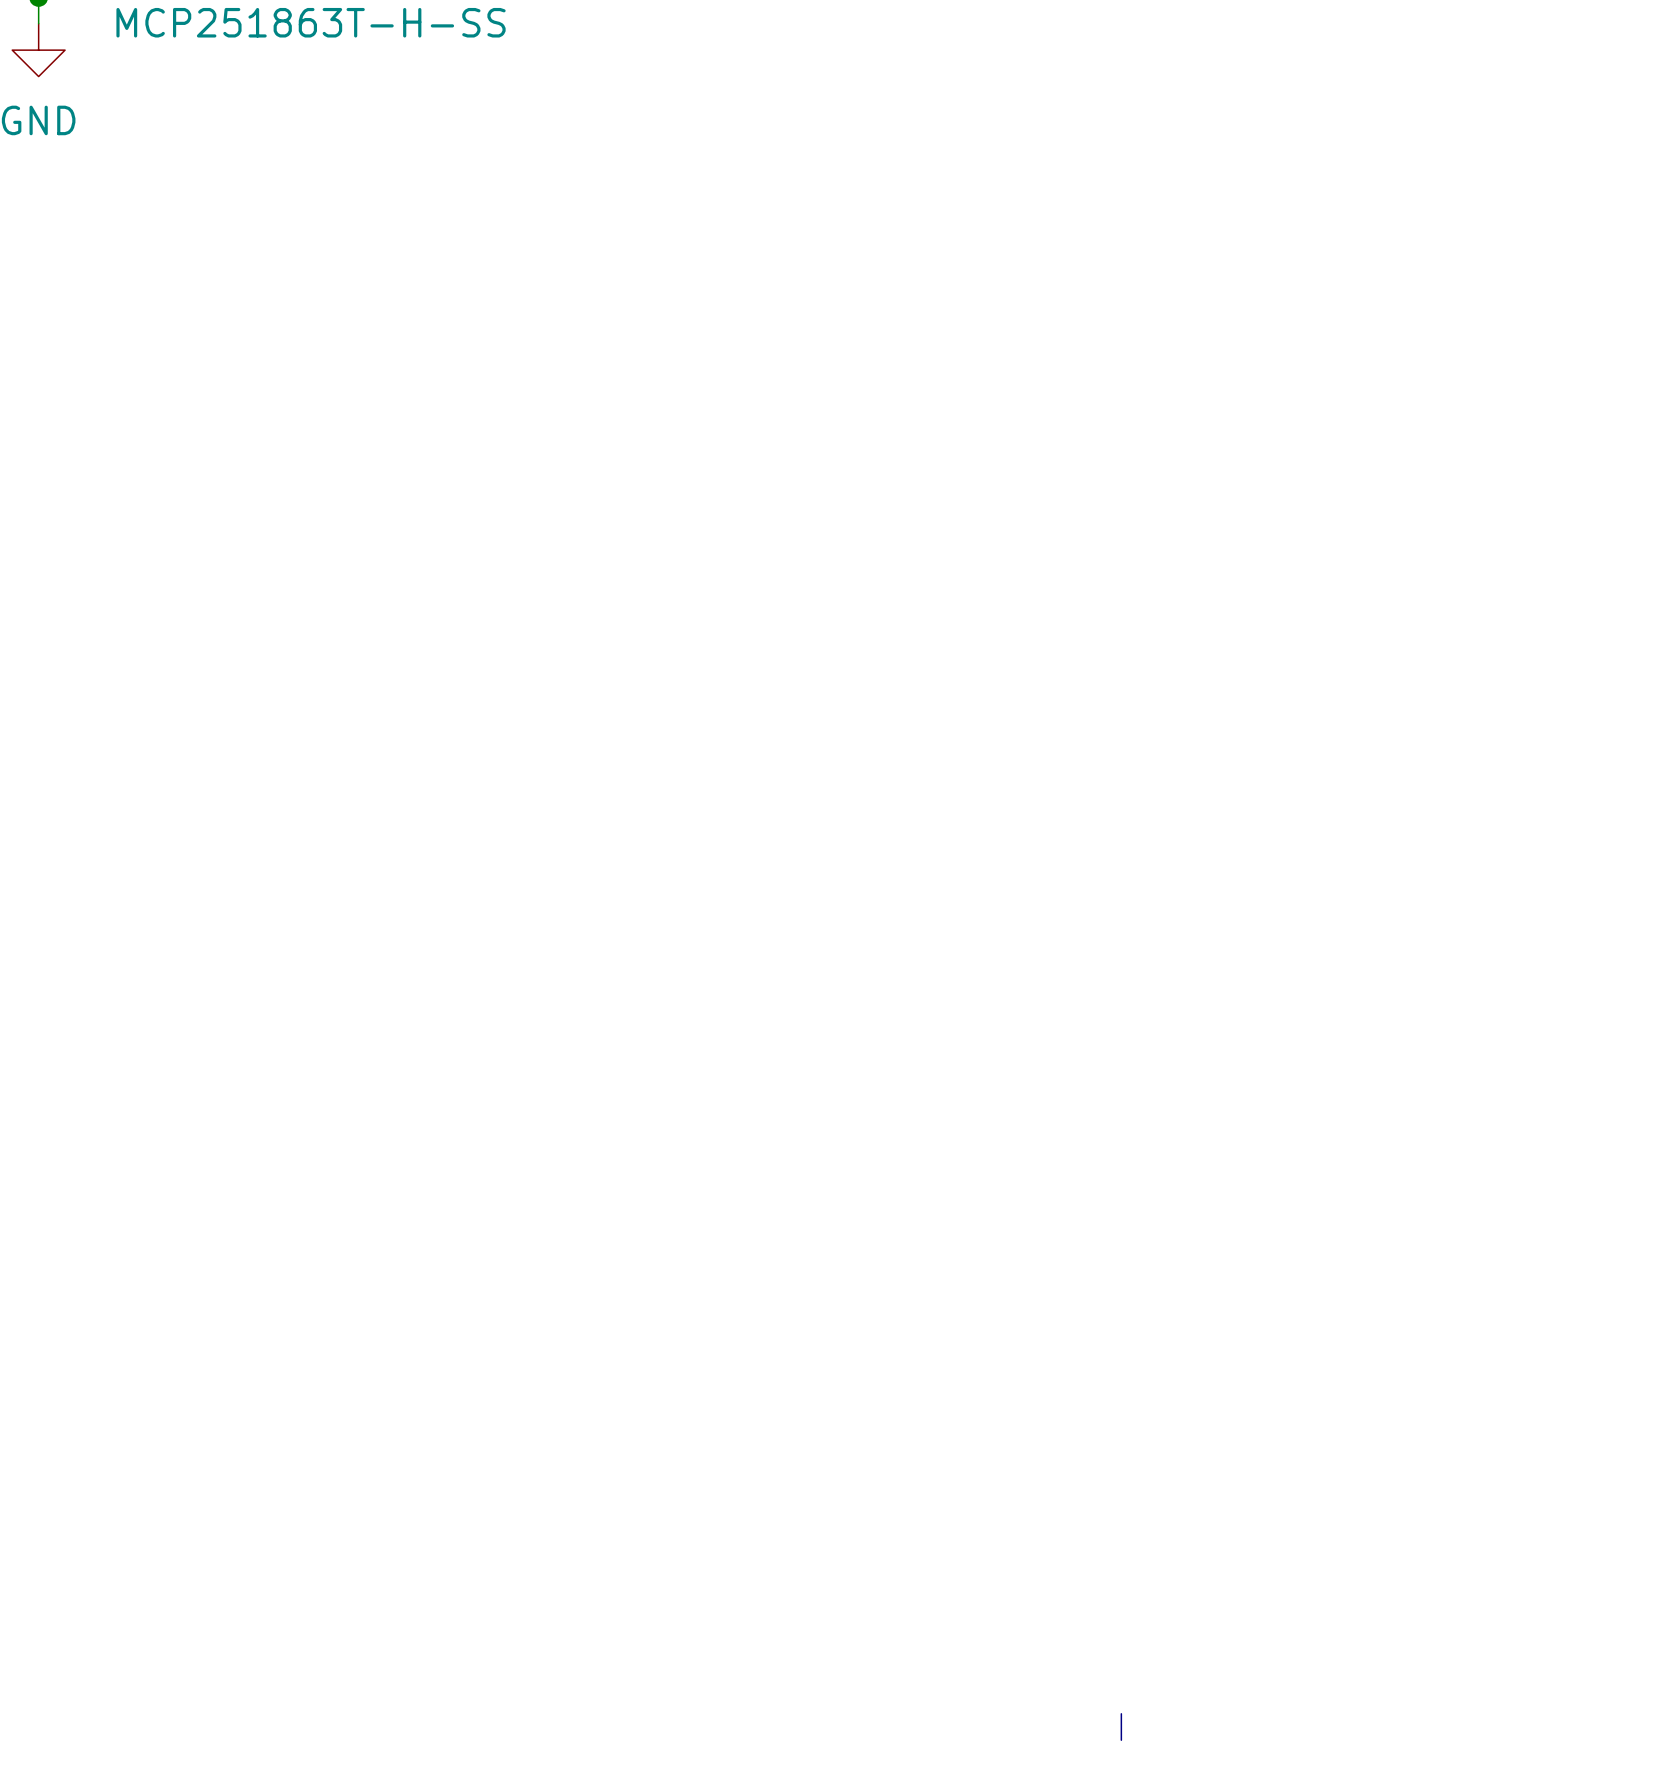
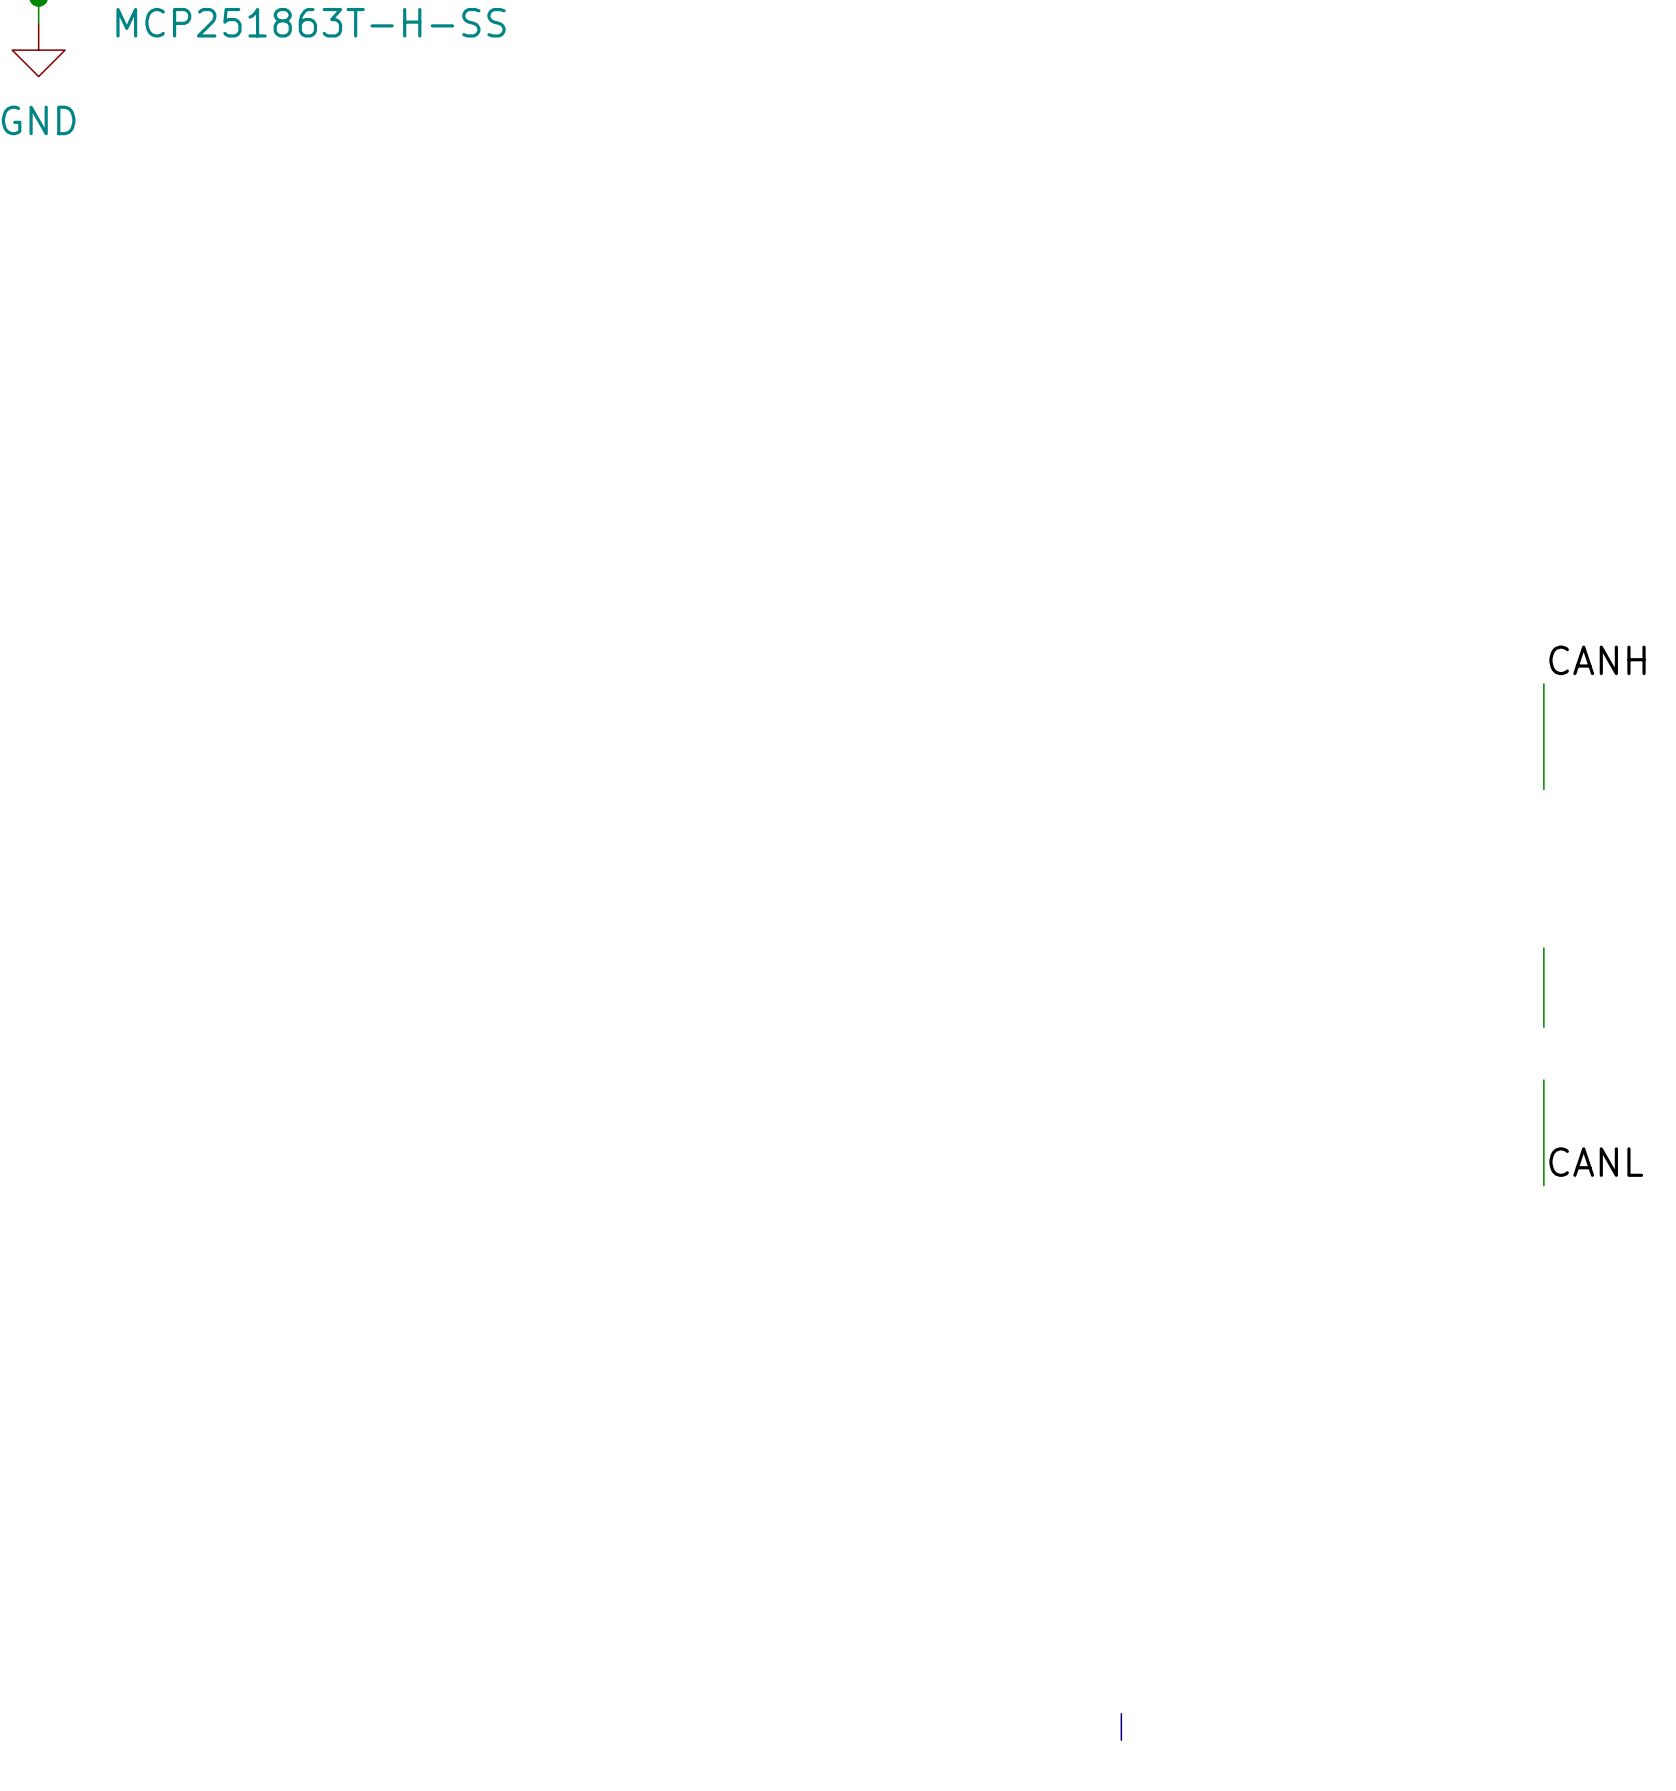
label: none -> CANH (1597, 660)
wire: none -> (1543, 683) (1543, 789)
wire: none -> (1543, 947) (1543, 1027)
wire: none -> (1543, 1080) (1543, 1185)
label: none -> CANL (1596, 1162)

